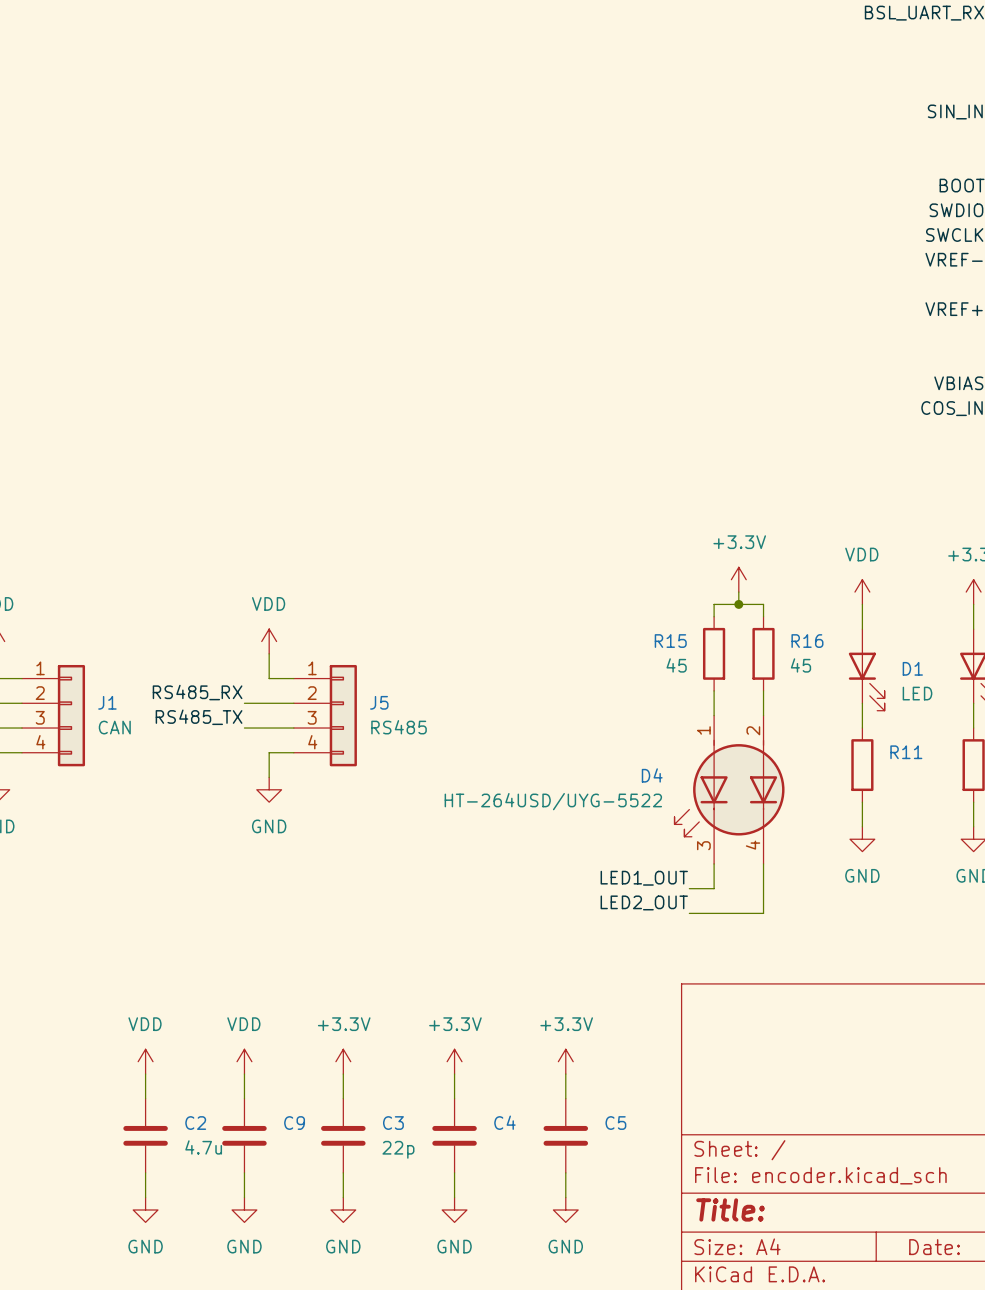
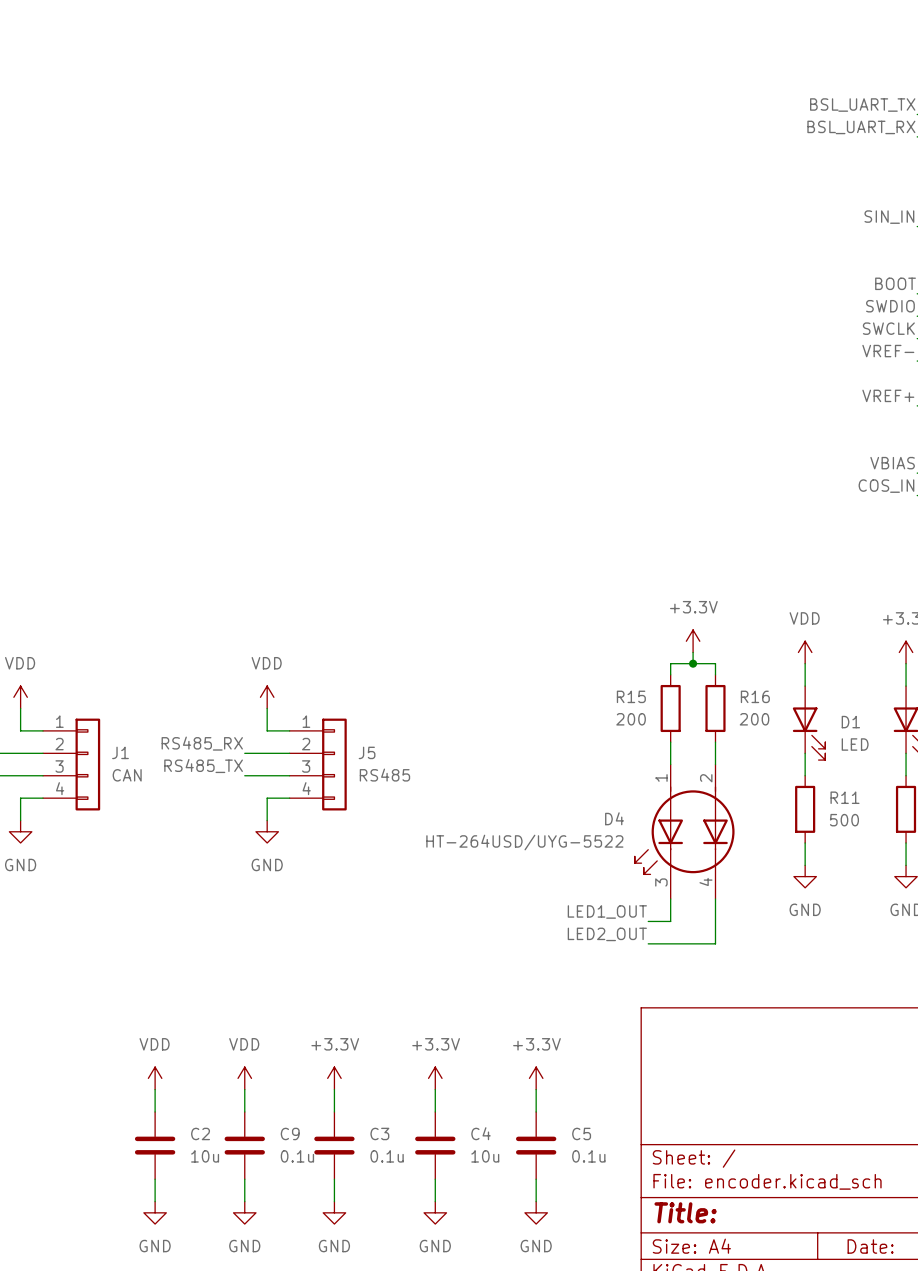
R15 value: 45 (676, 665) -> 200 (631, 719)
R16 value: 45 (800, 665) -> 200 (754, 719)
R11 value: none -> 500 (844, 820)
C2 value: 4.7u (203, 1147) -> 10u (205, 1156)
C9 value: none -> 0.1u (297, 1156)
C4 value: none -> 10u (485, 1156)
C5 value: none -> 0.1u (588, 1156)
C3 value: 22p (398, 1149) -> 0.1u (387, 1156)

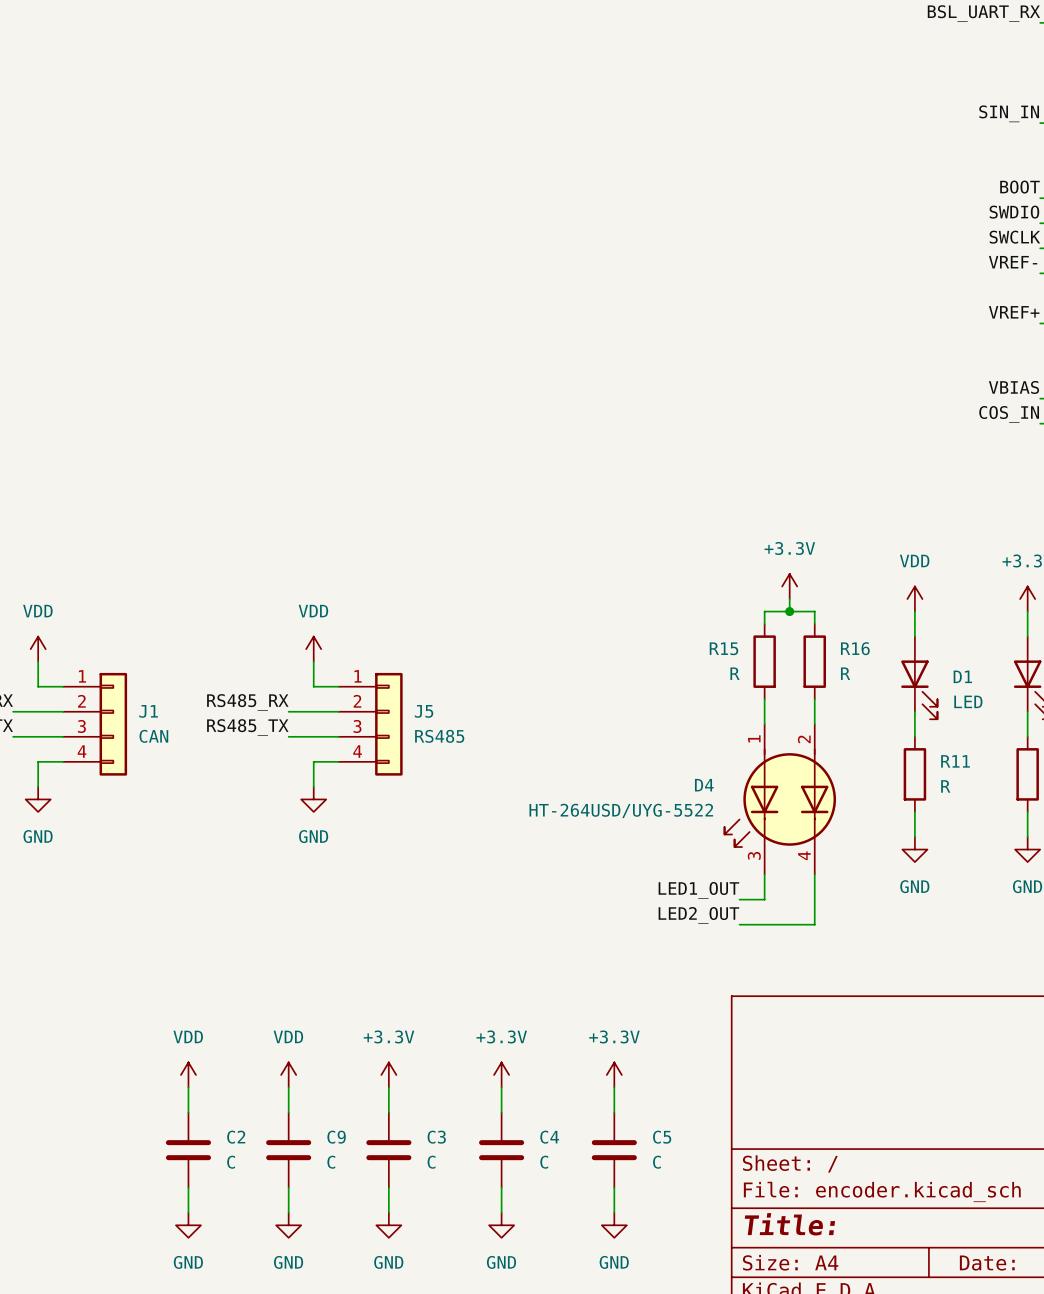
R15 value: 200 (631, 719) -> R (735, 673)
R16 value: 200 (754, 719) -> R (845, 673)
R11 value: 500 (844, 820) -> R (945, 786)
C2 value: 10u (205, 1156) -> C (231, 1162)
C9 value: 0.1u (297, 1156) -> C (331, 1162)
C3 value: 0.1u (387, 1156) -> C (431, 1162)
C4 value: 10u (485, 1156) -> C (544, 1162)
C5 value: 0.1u (588, 1156) -> C (656, 1162)

